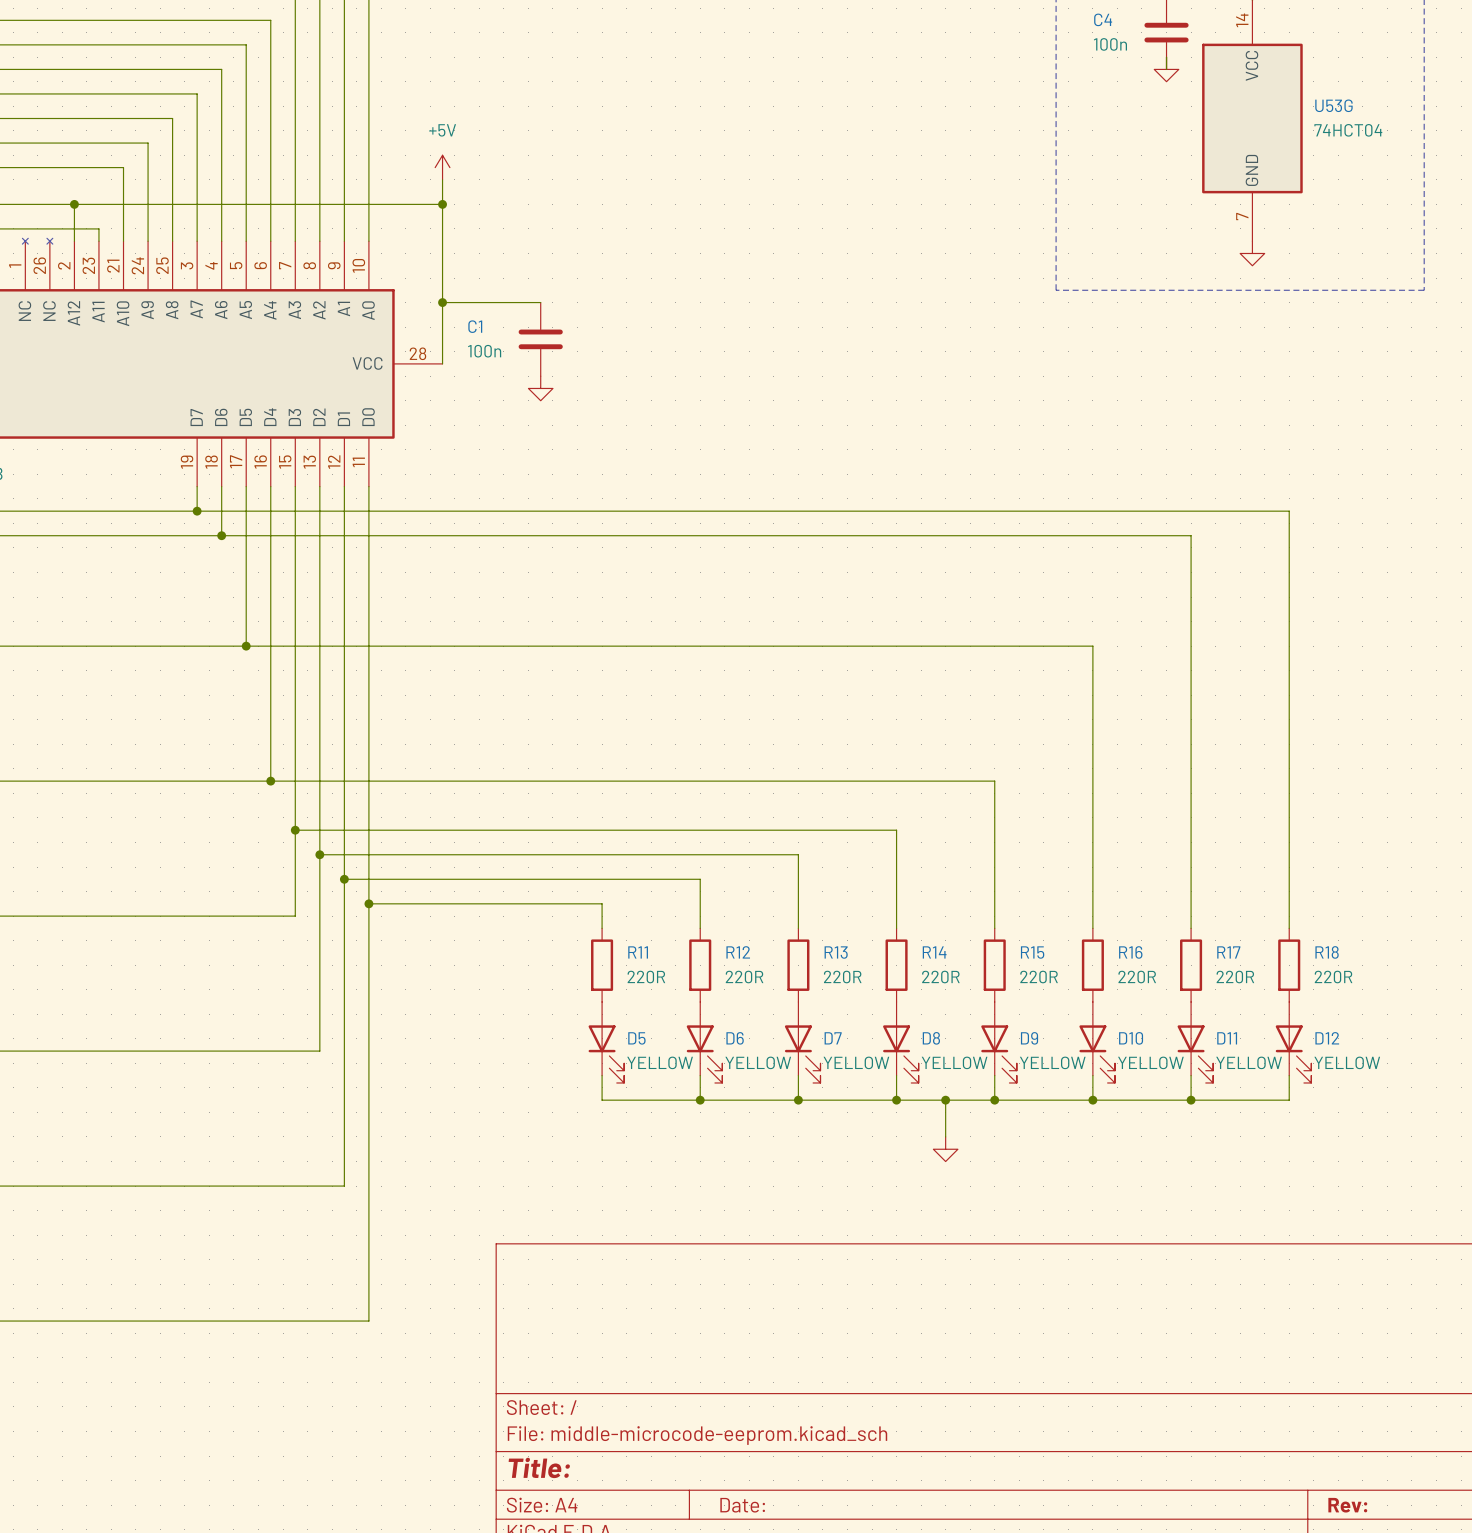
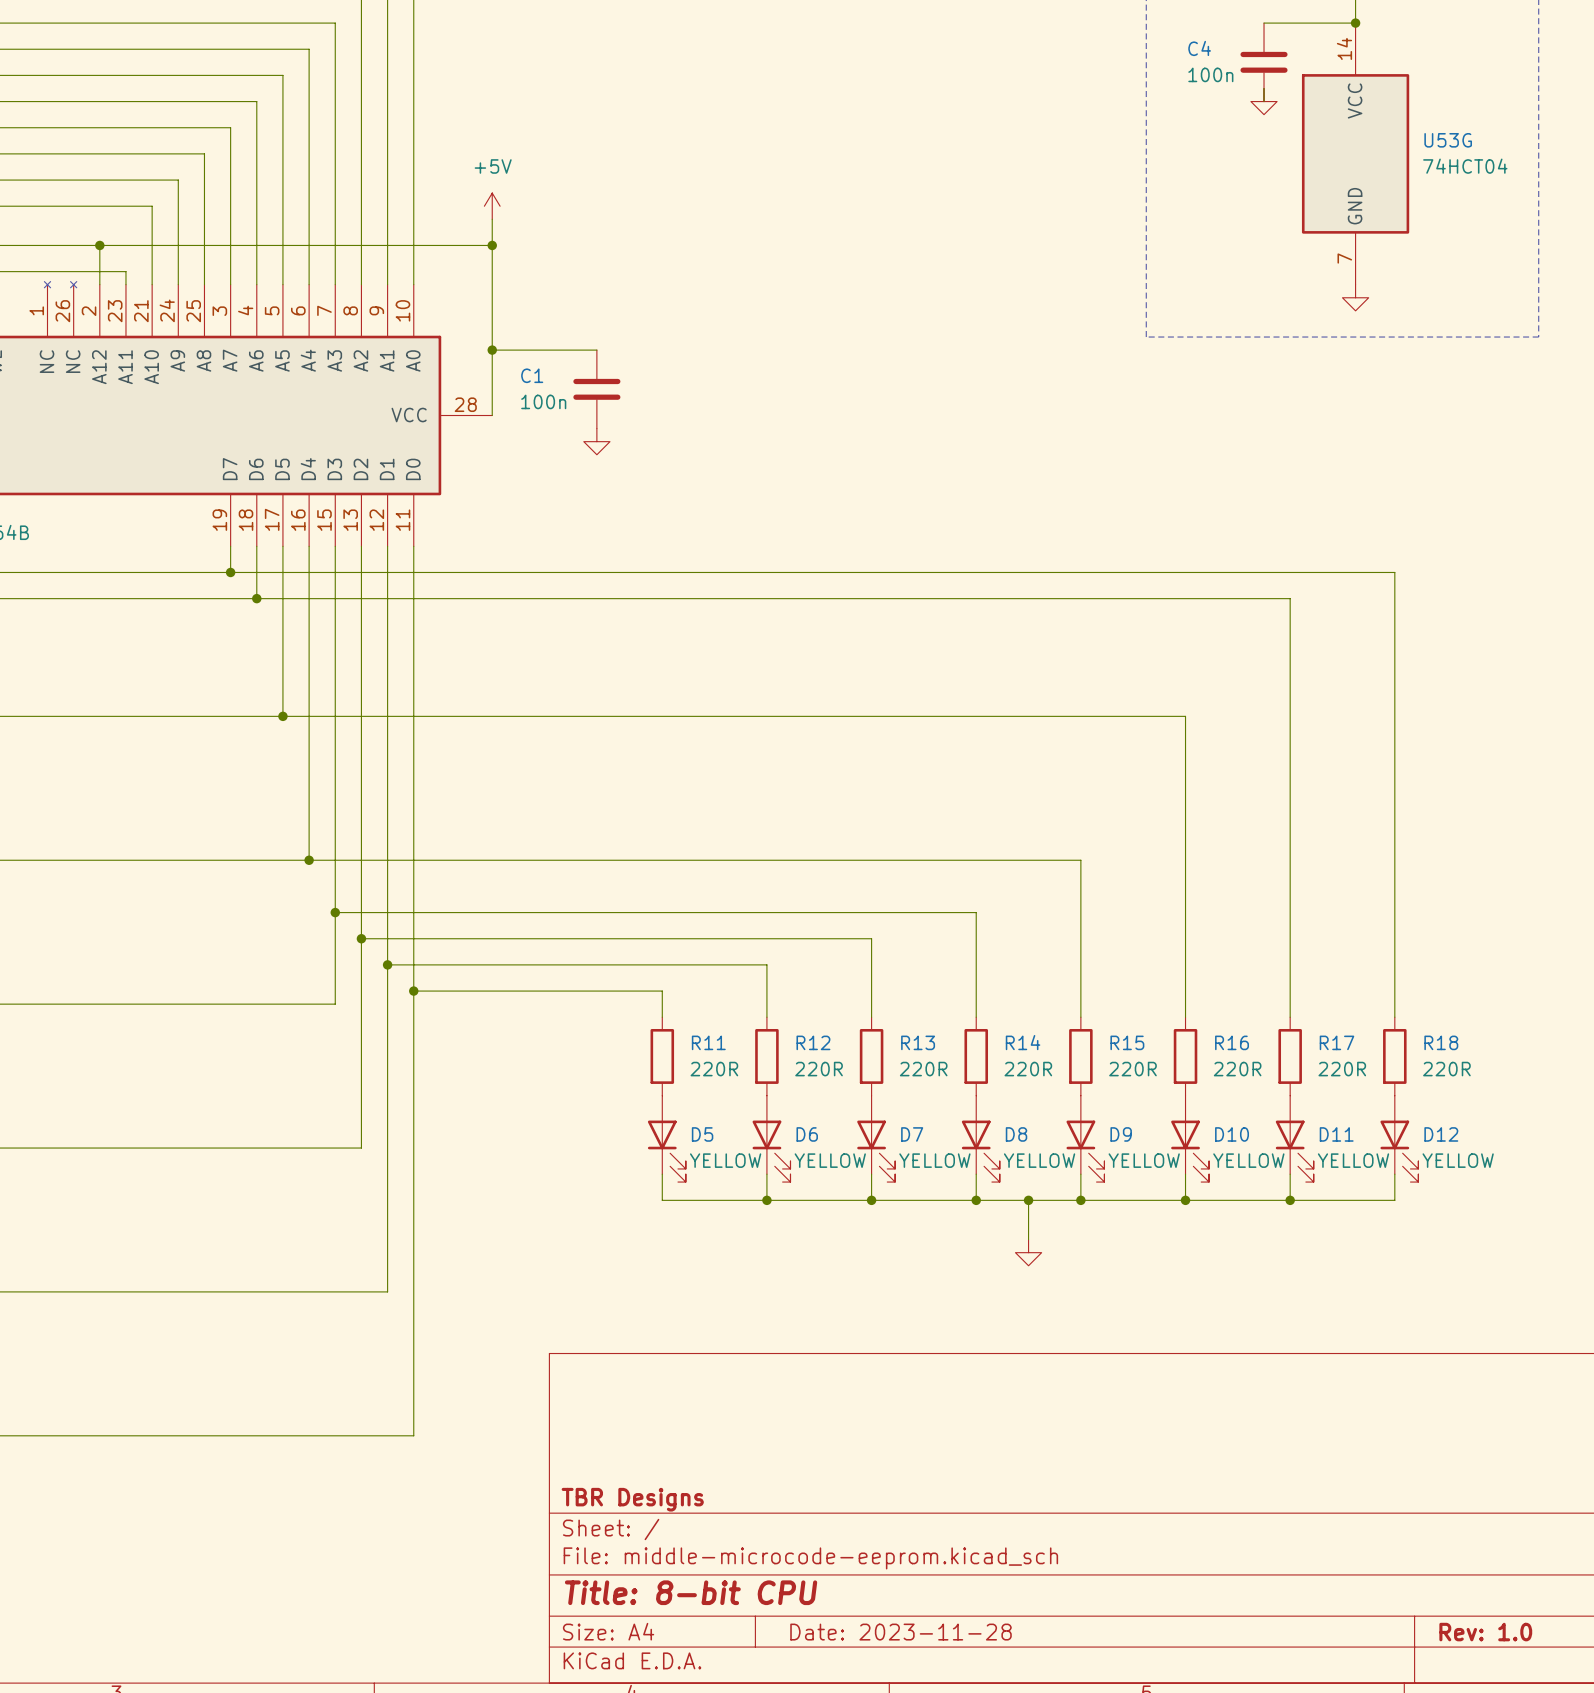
title block: none -> TBR Designs (632, 1499)
title block: Title: (539, 1467) -> Title: 8-bit CPU (691, 1592)
title block: Date: (742, 1505) -> Date: 2023-11-28 (901, 1632)
title block: Rev: (1347, 1505) -> Rev: 1.0 (1485, 1632)

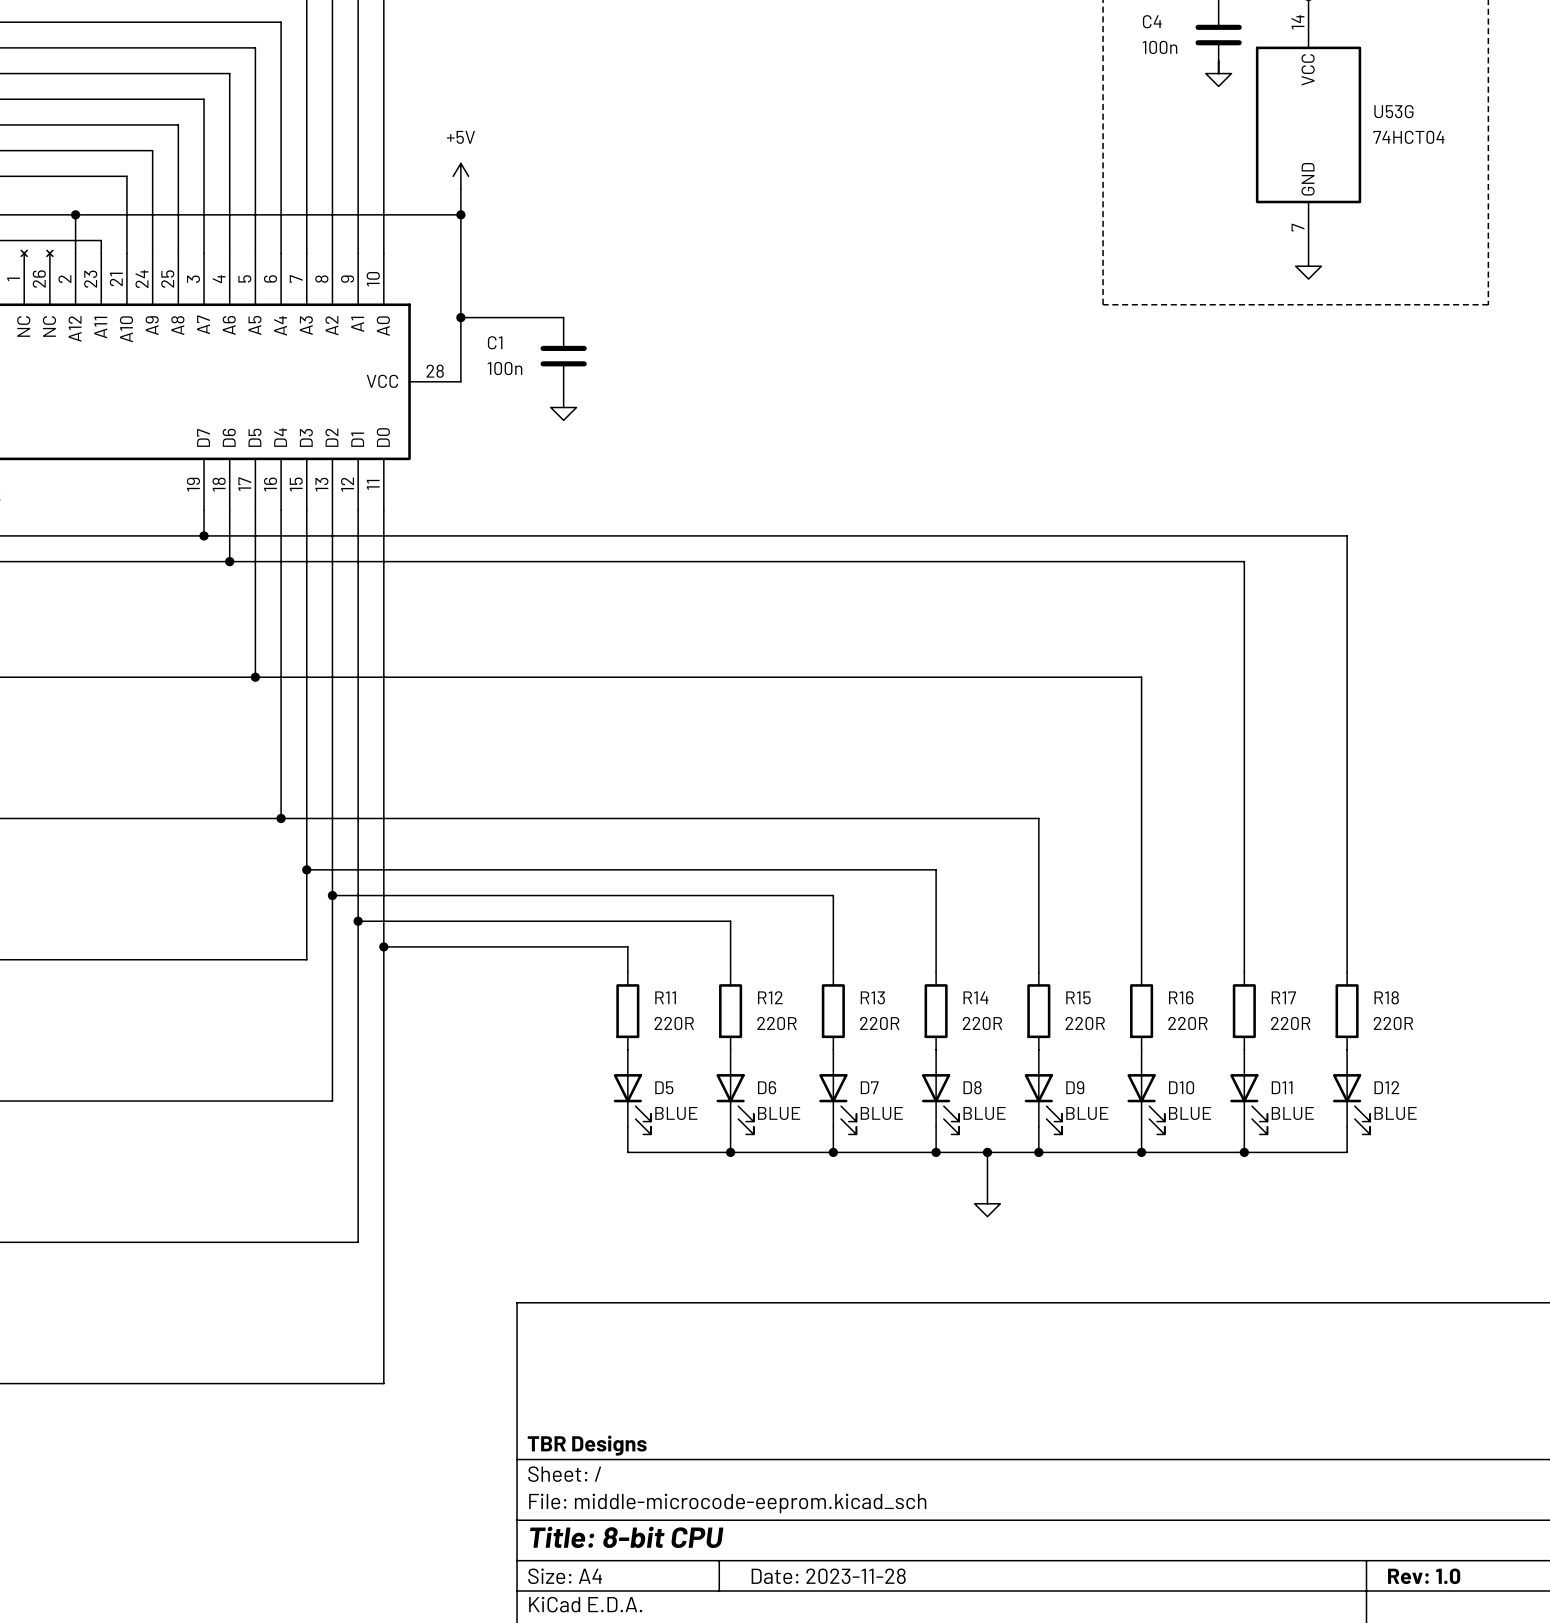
D5 value: YELLOW (725, 1160) -> BLUE (676, 1113)
D6 value: YELLOW (830, 1160) -> BLUE (779, 1113)
D7 value: YELLOW (934, 1160) -> BLUE (881, 1113)
D8 value: YELLOW (1039, 1160) -> BLUE (984, 1113)
D9 value: YELLOW (1144, 1160) -> BLUE (1087, 1113)
D10 value: YELLOW (1248, 1160) -> BLUE (1190, 1113)
D11 value: YELLOW (1353, 1160) -> BLUE (1292, 1113)
D12 value: YELLOW (1458, 1160) -> BLUE (1395, 1113)

